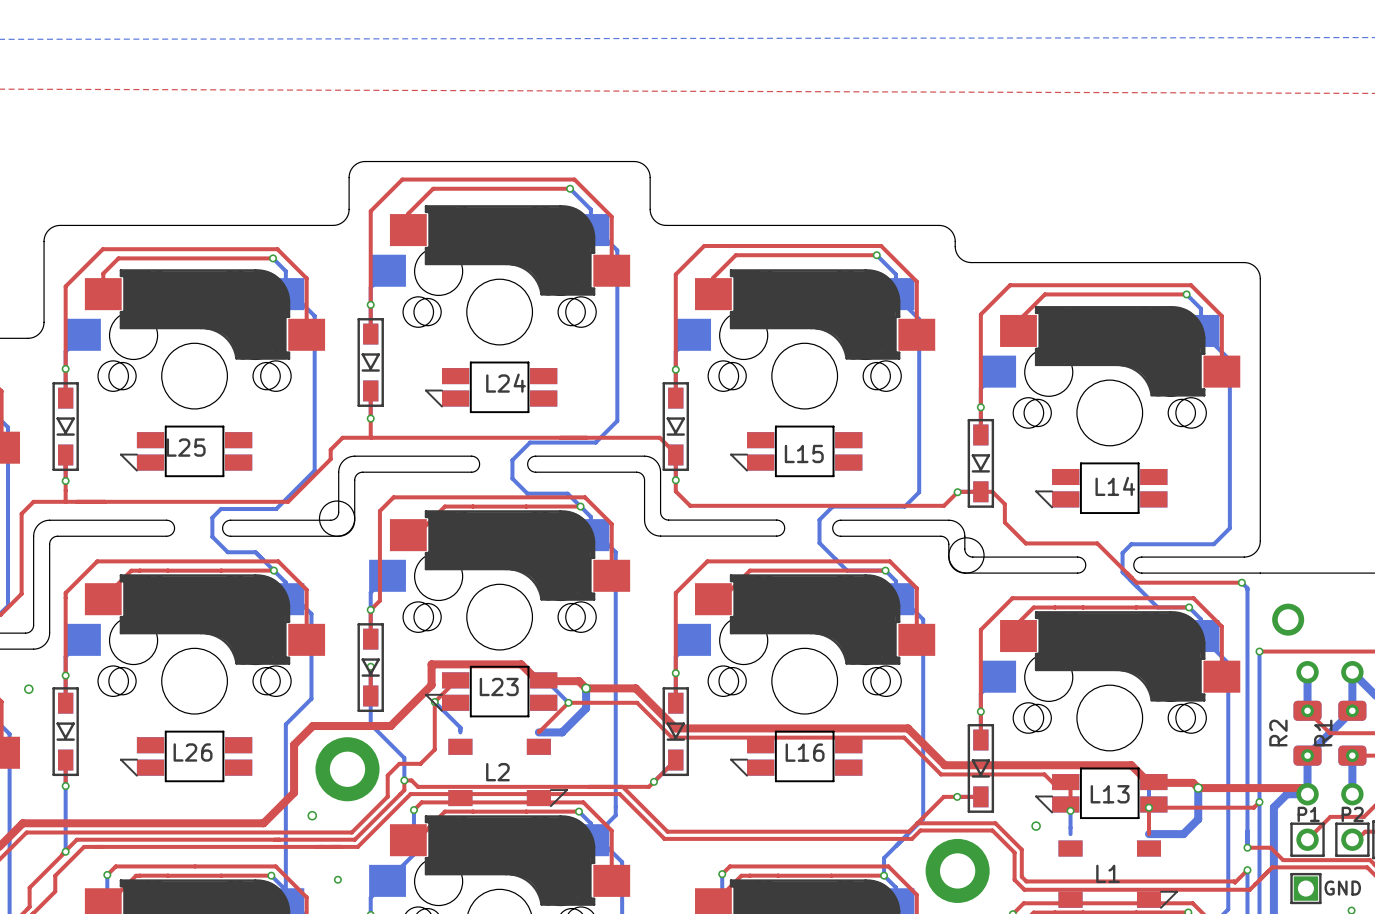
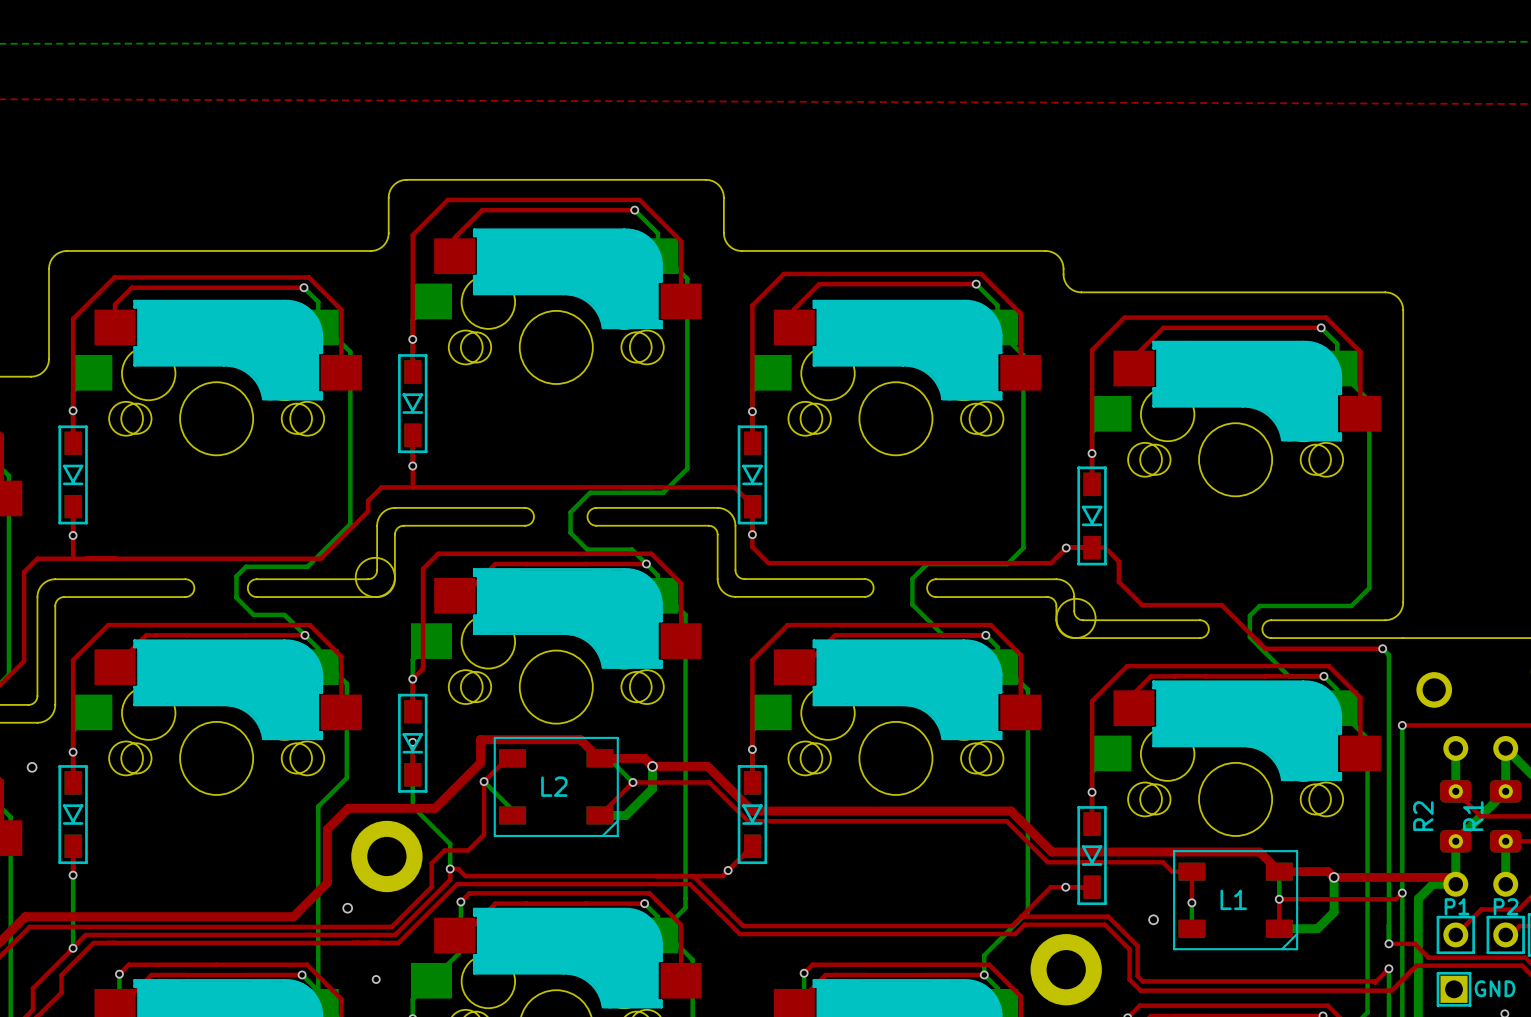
L24: (491, 387) -> none
L25: (186, 451) -> none
L15: (796, 451) -> none
L14: (1101, 488) -> none
L23: (491, 691) -> none
L2 footprint: [448, 738, 568, 808] -> [493, 736, 619, 838]
L26: (186, 756) -> none
L16: (796, 756) -> none
L13: (1101, 793) -> none
L1 footprint: [1058, 840, 1178, 909] -> [1173, 850, 1299, 951]

